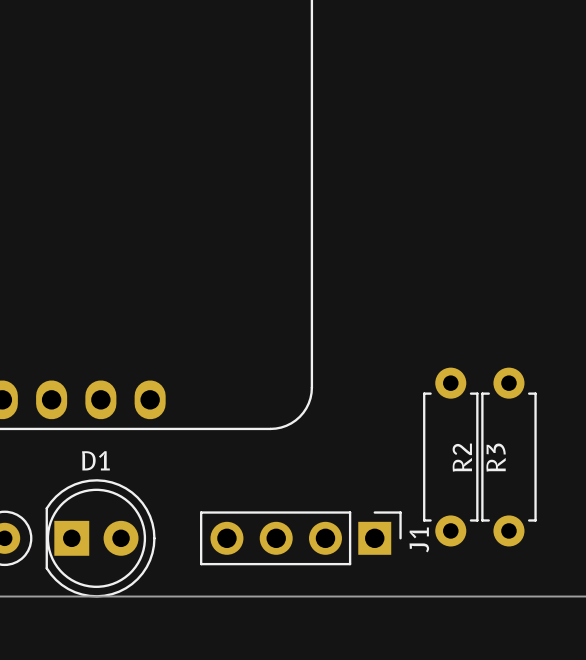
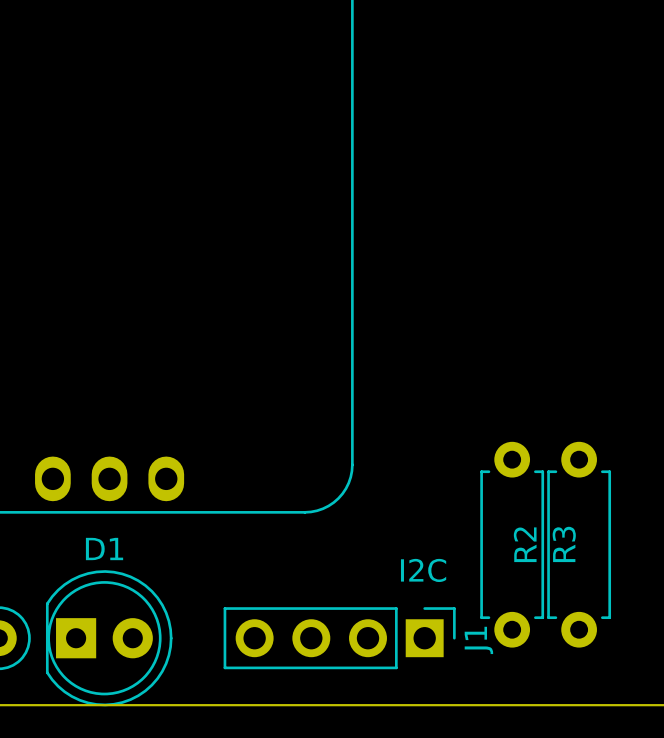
J1 value: none -> I2C (423, 570)

